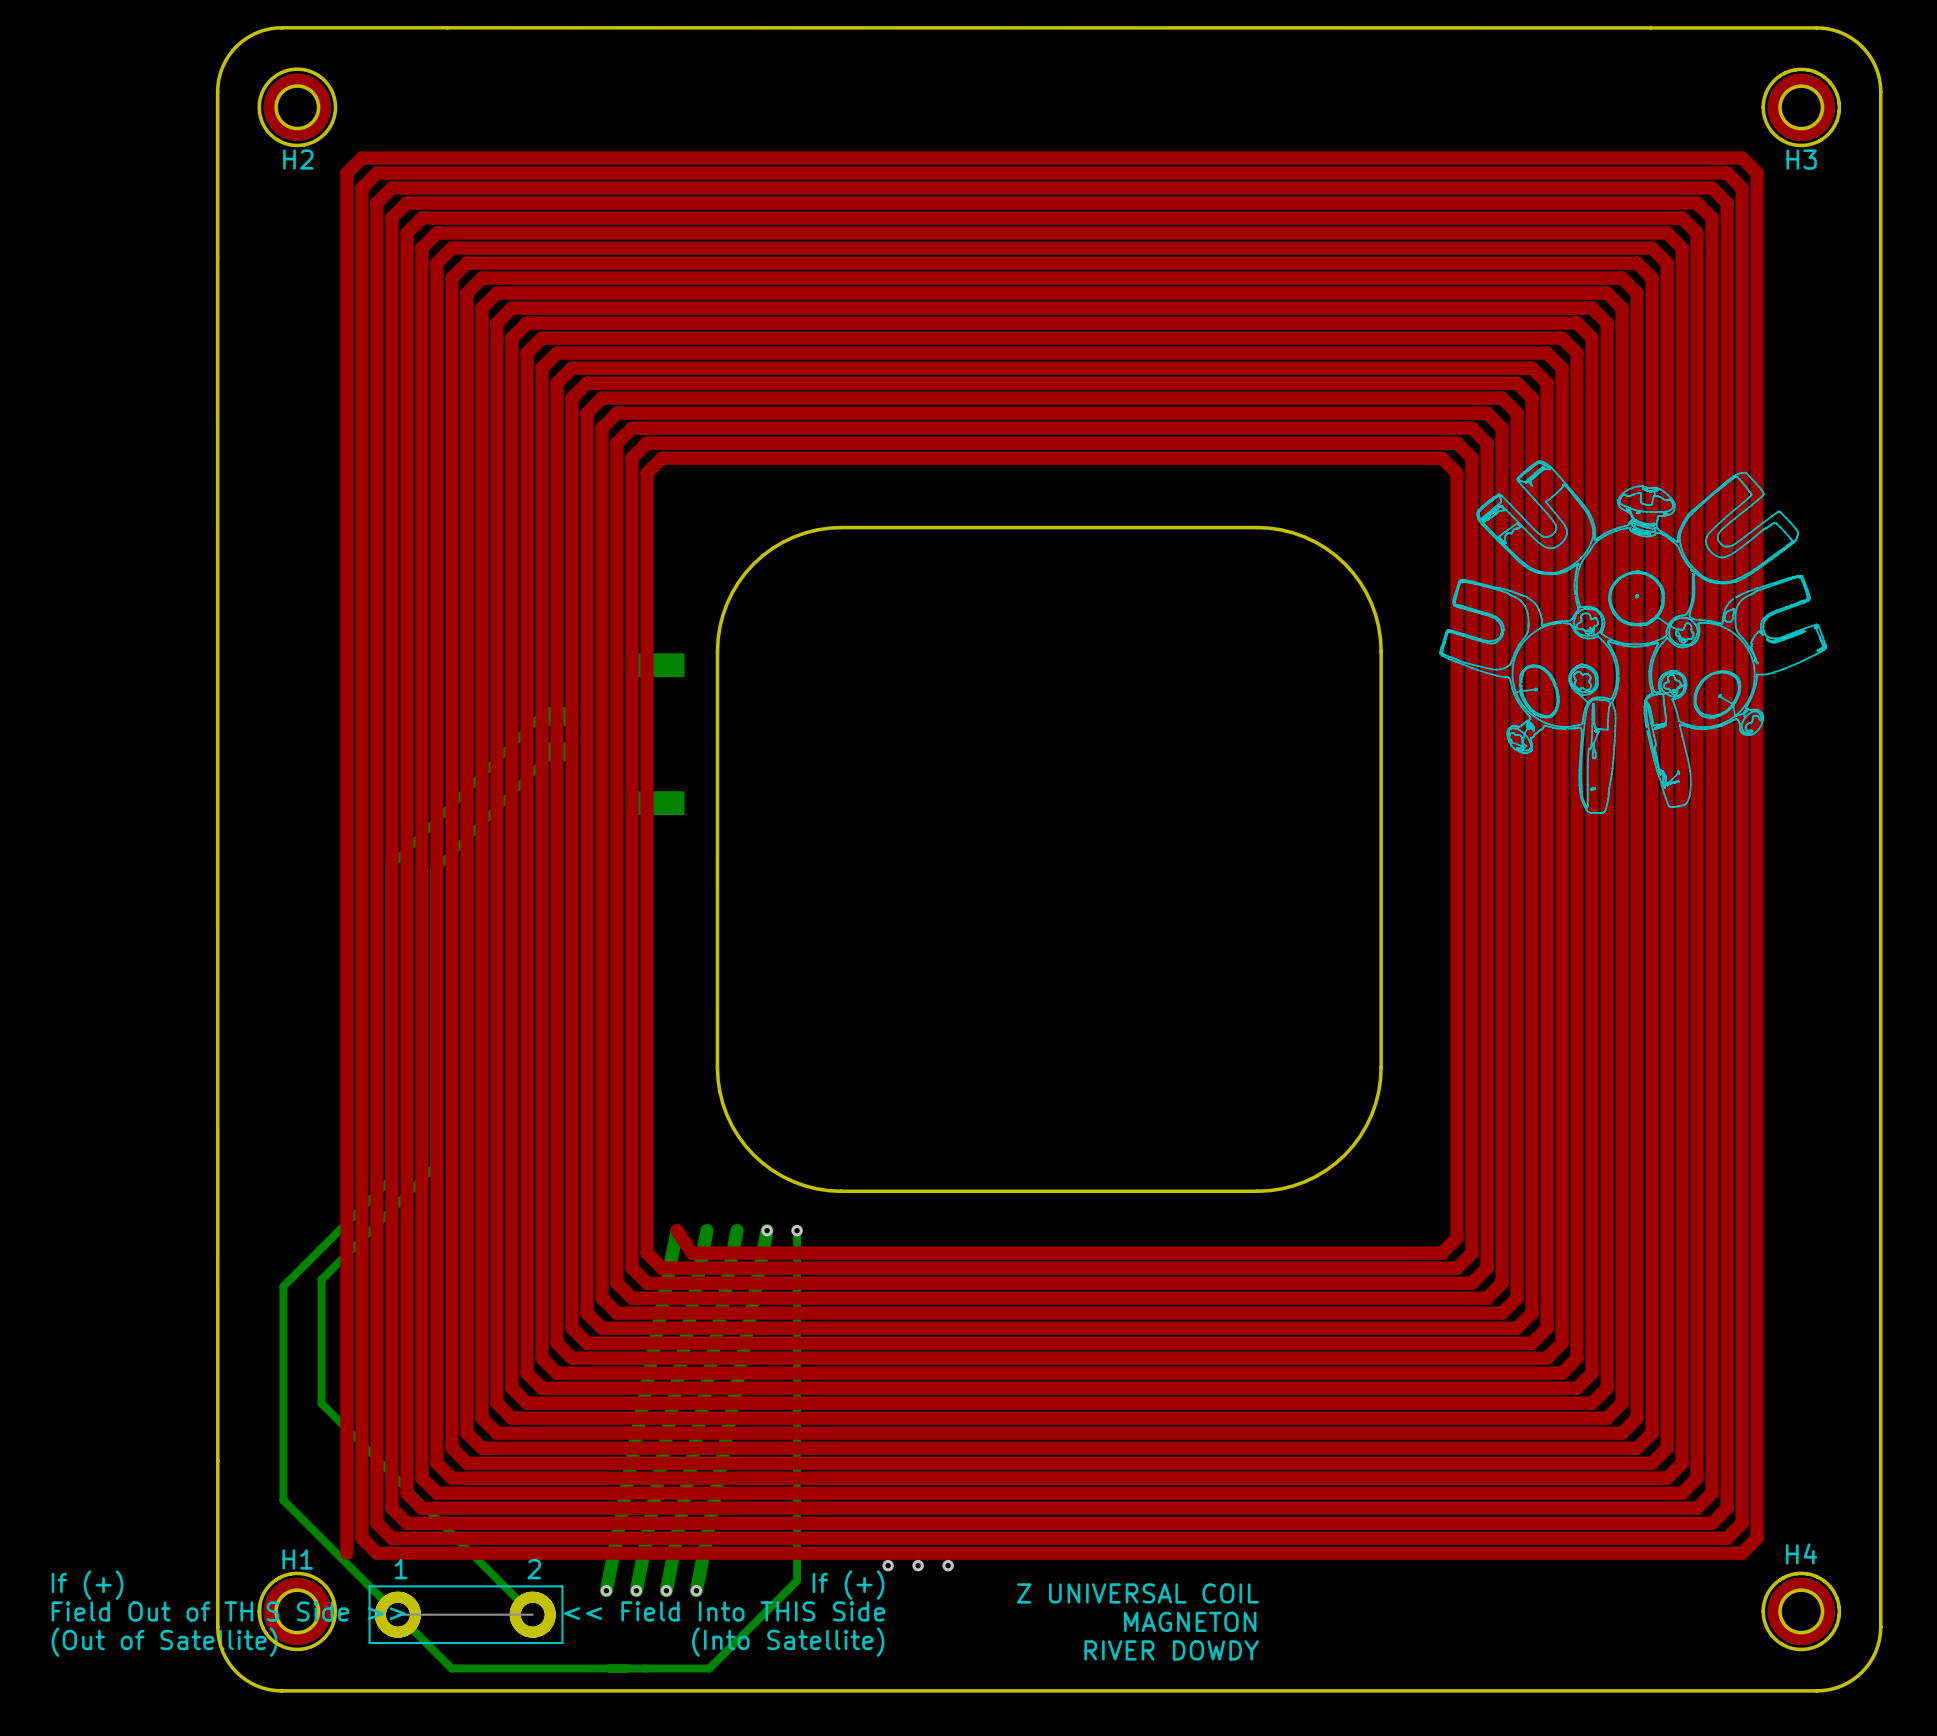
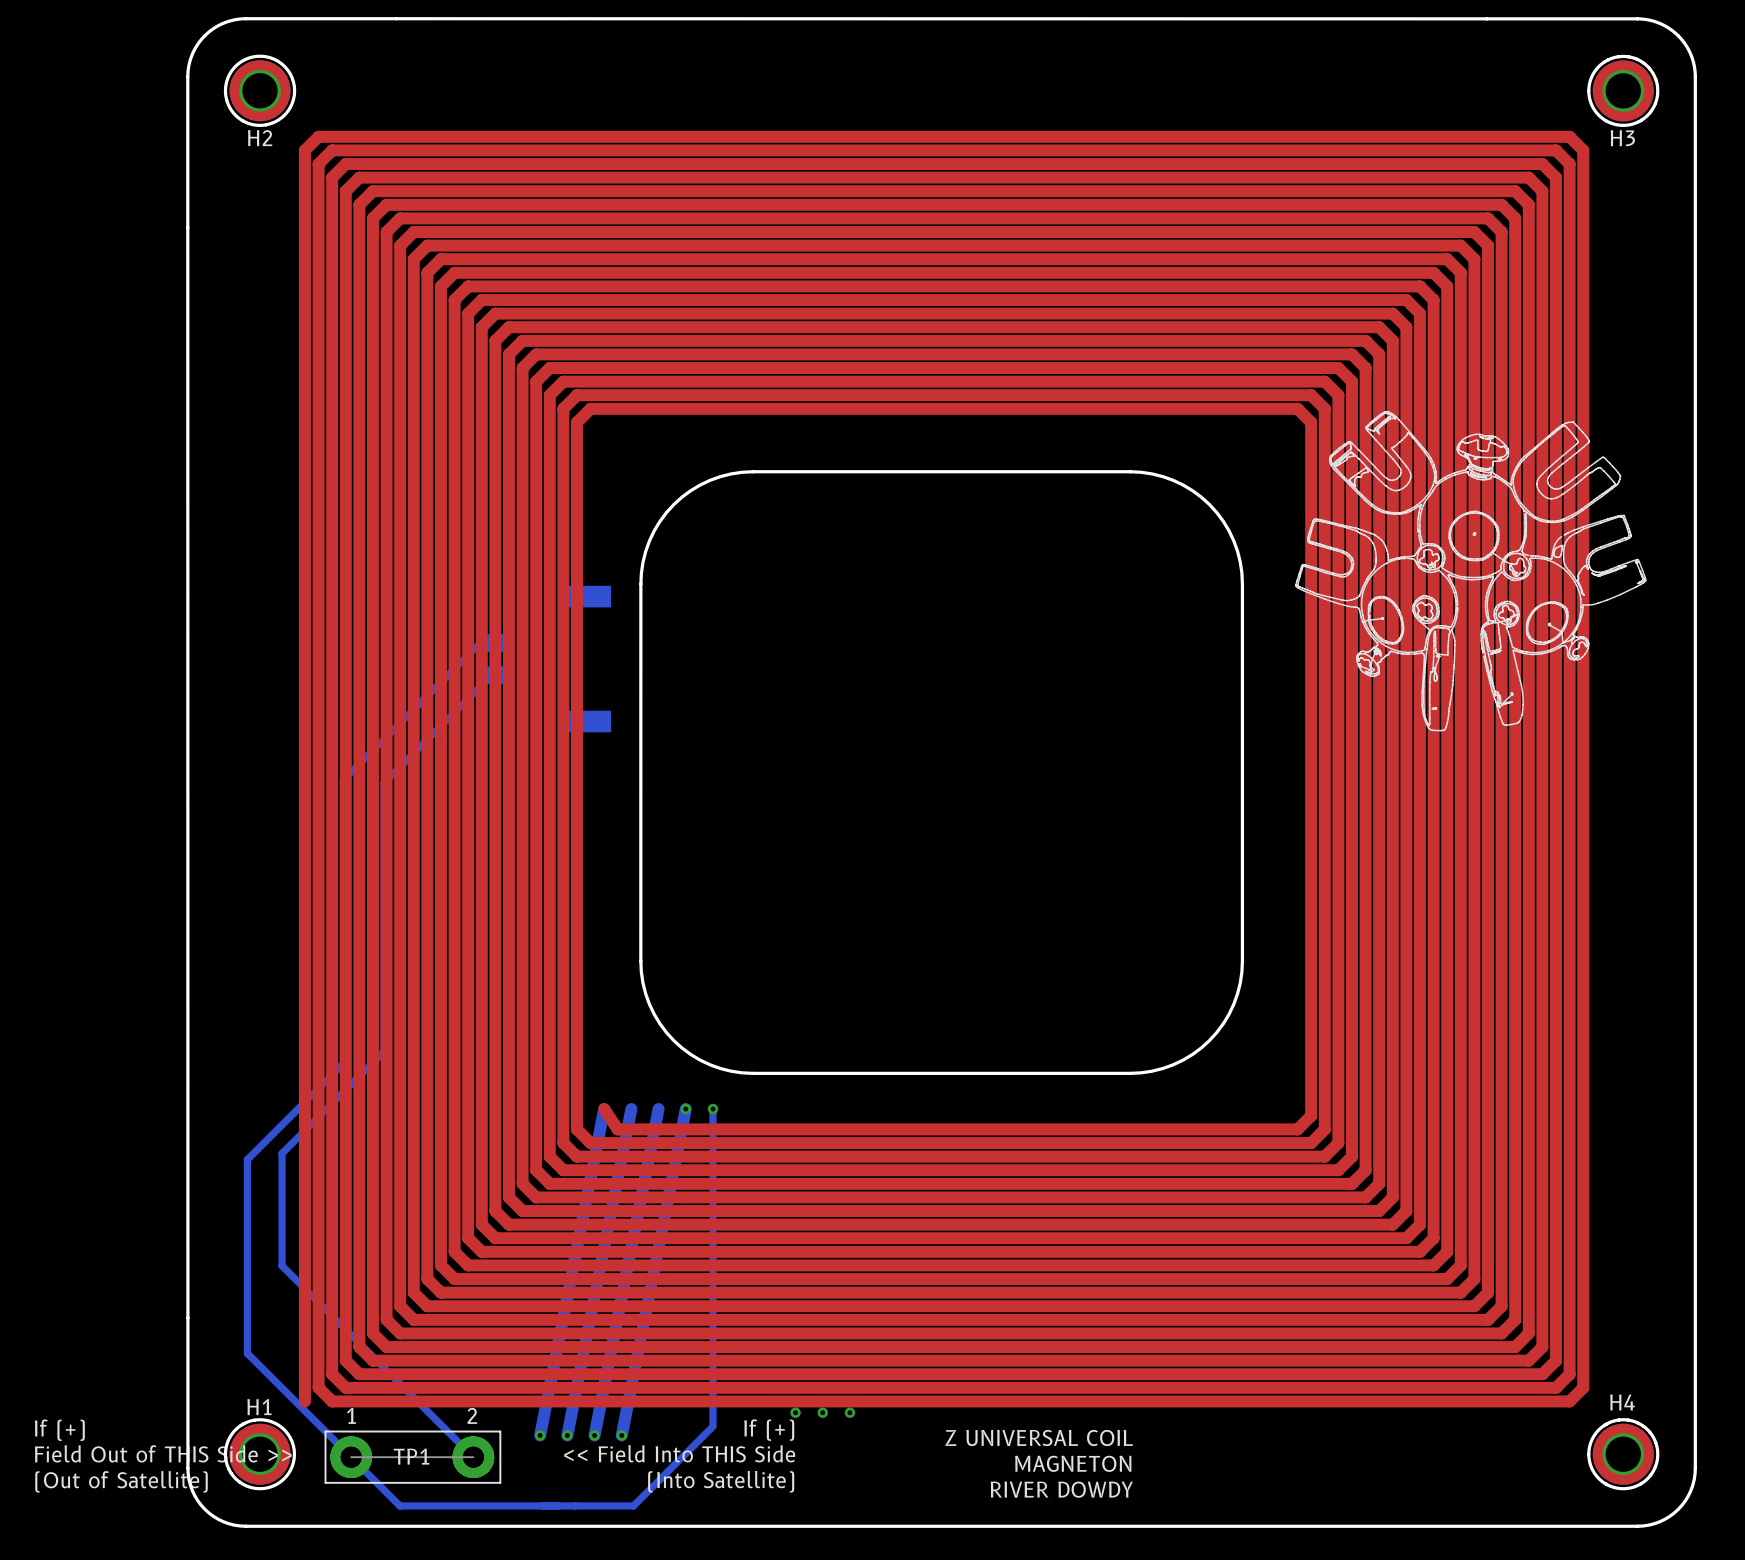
TP1 name: none -> TP1 (411, 1456)

